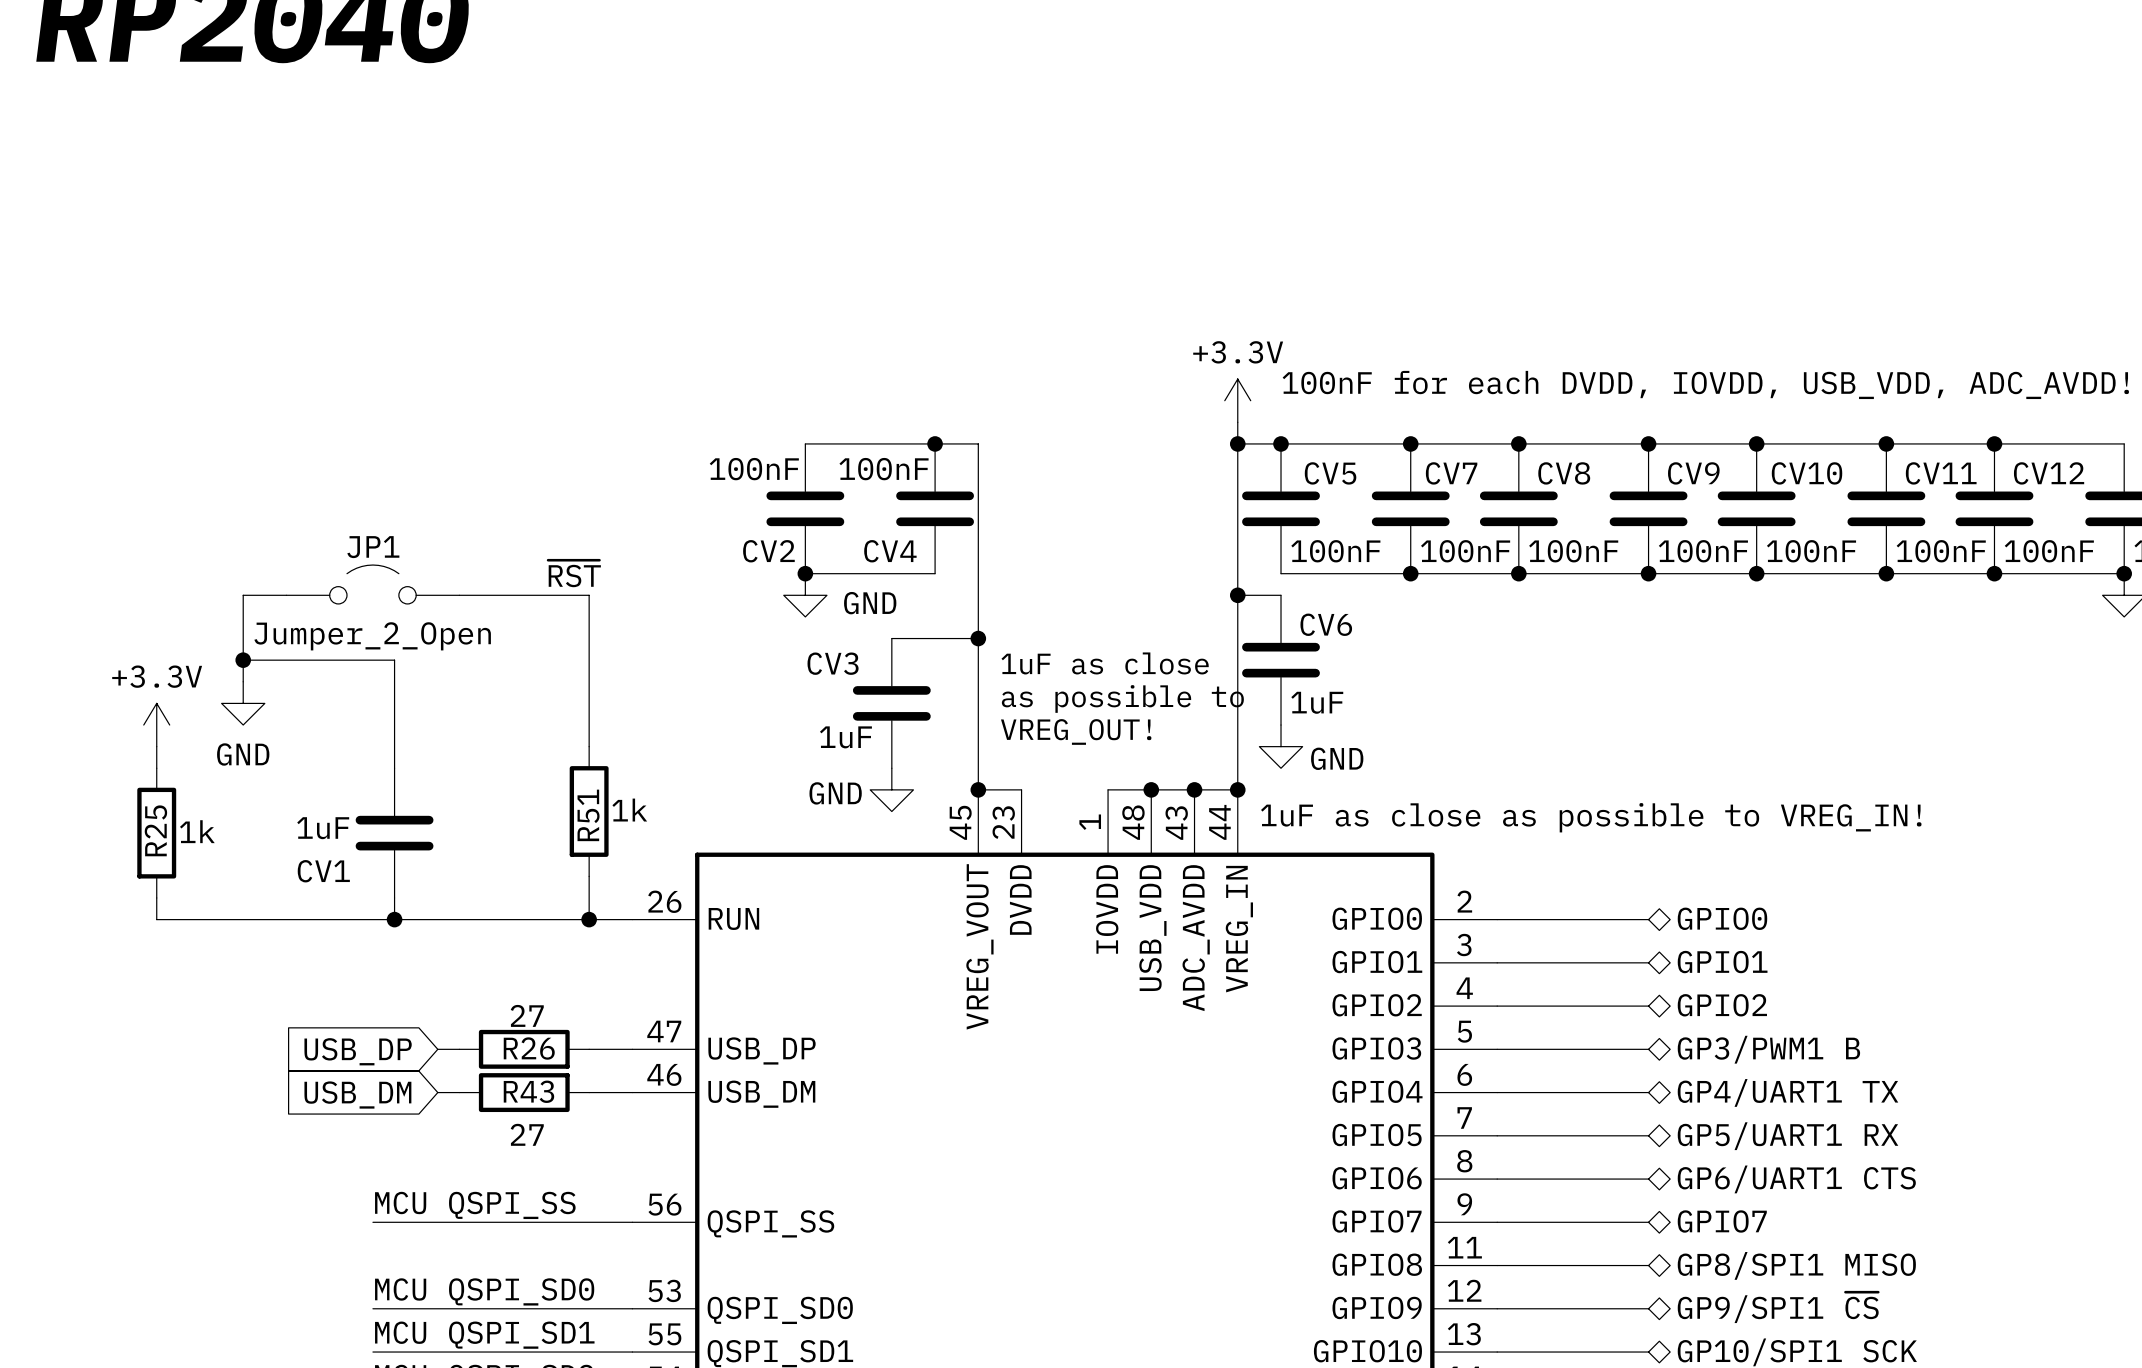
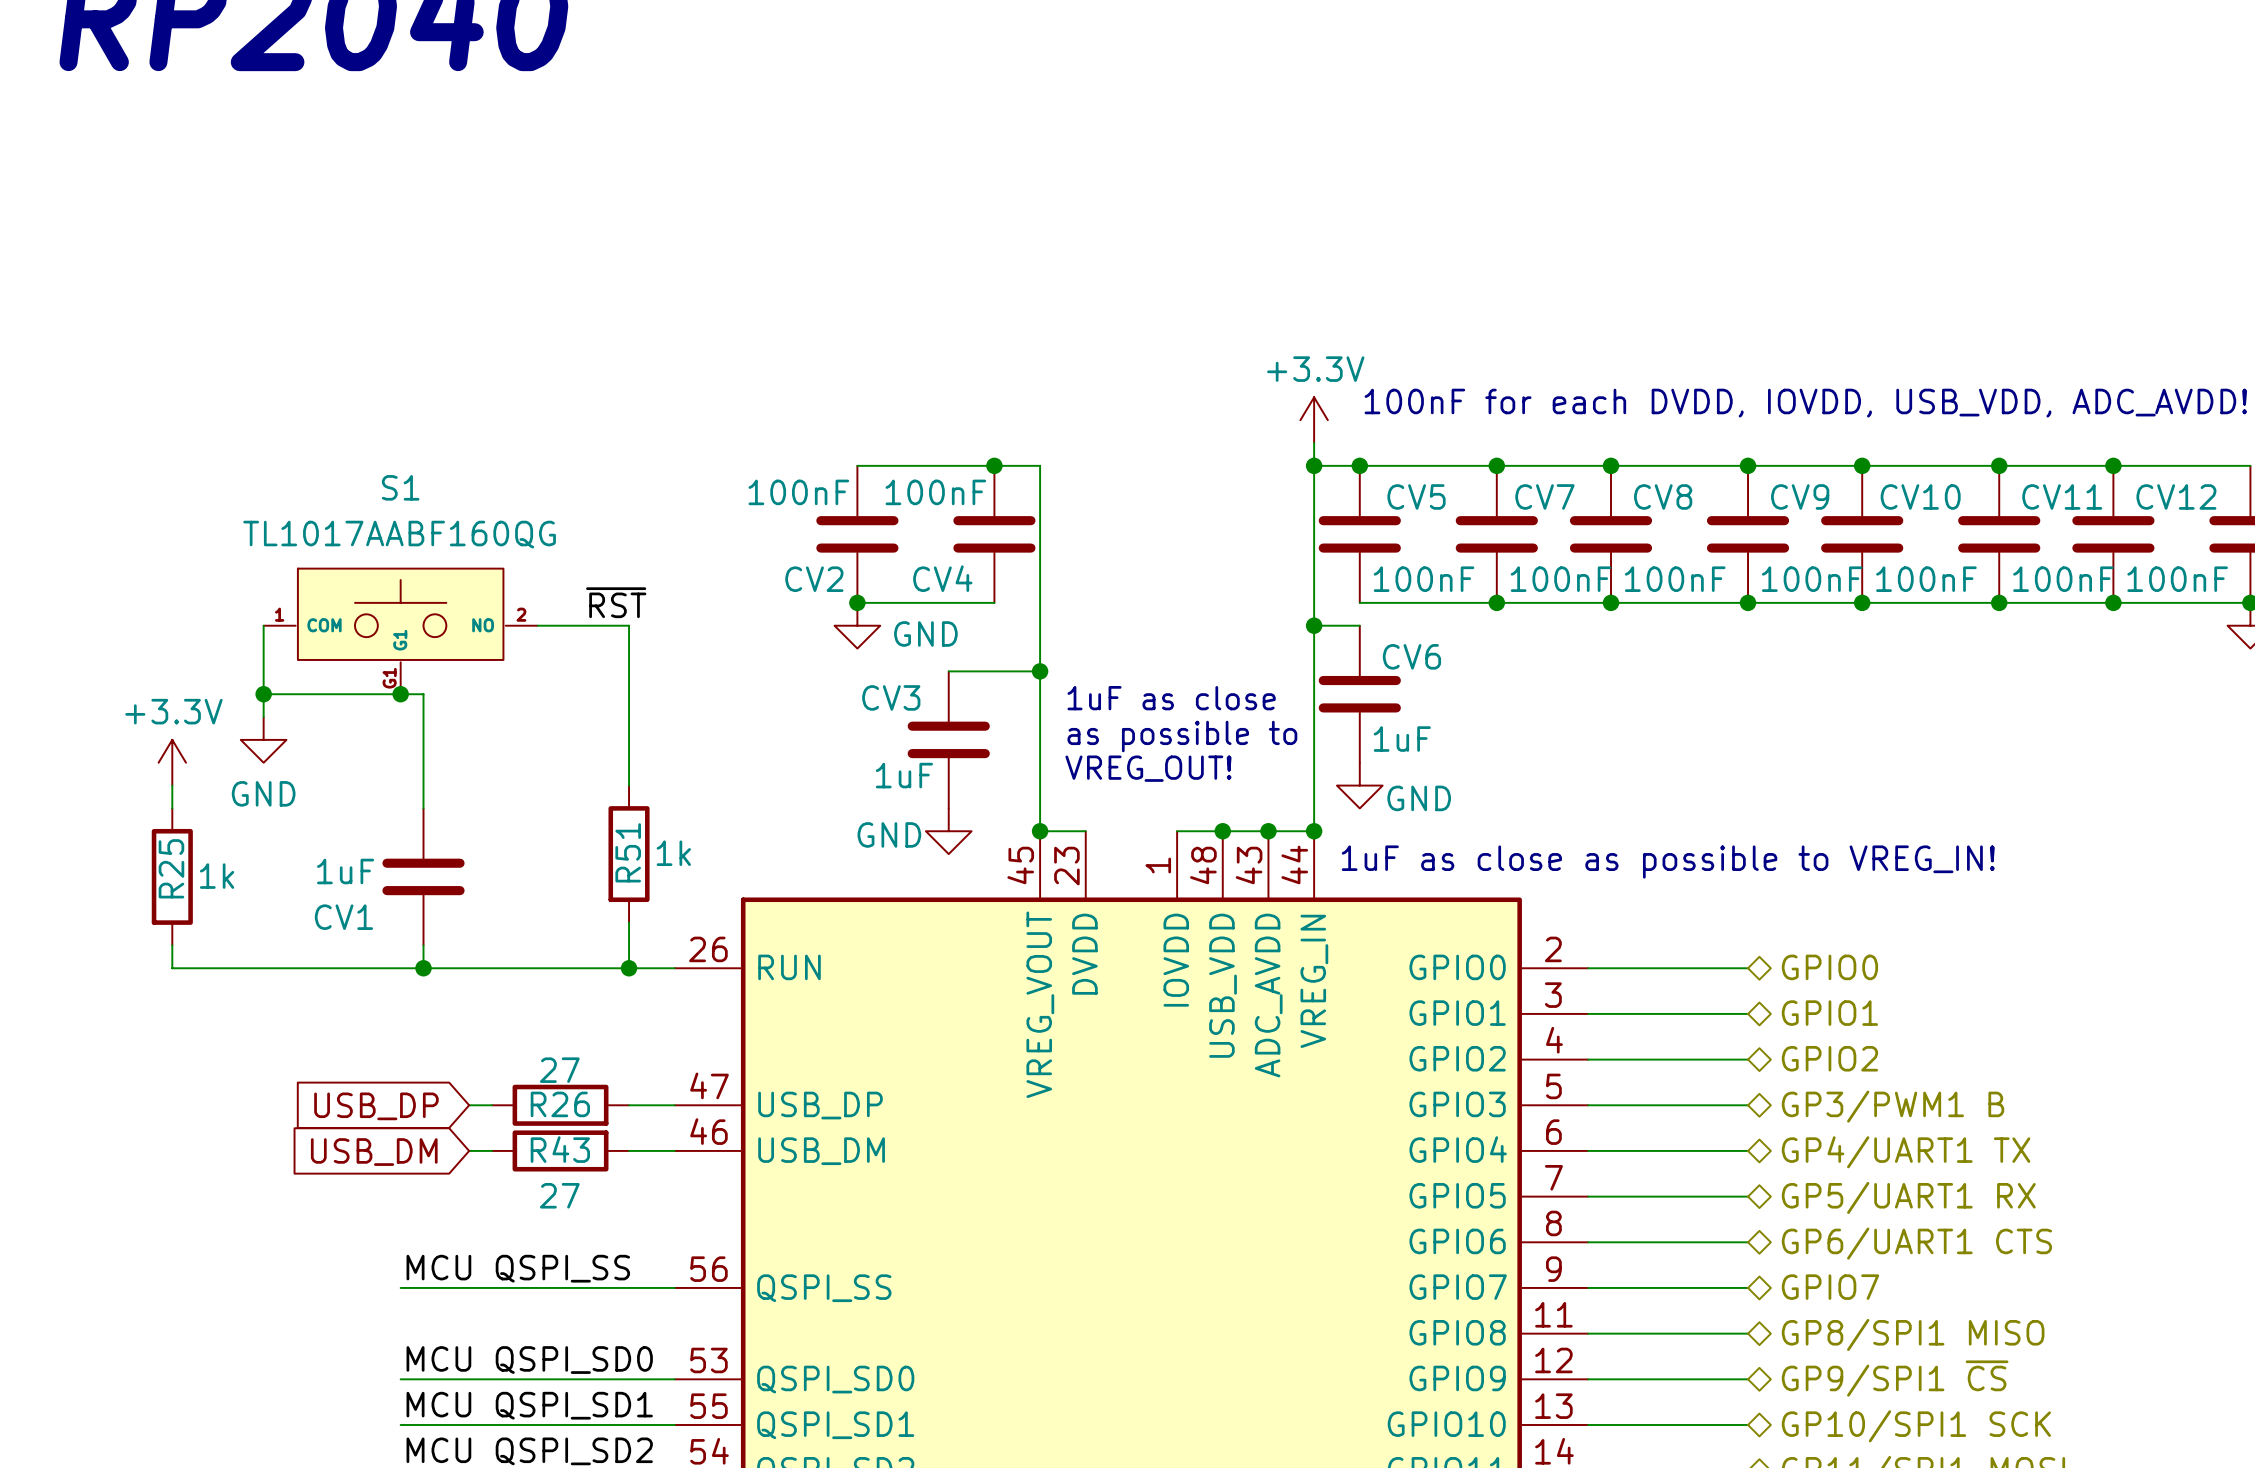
JP1: Jumper_2_Open (372, 584) -> none
S1: none -> TL1017AABF160QG (400, 631)
junction: none -> (400, 694)

